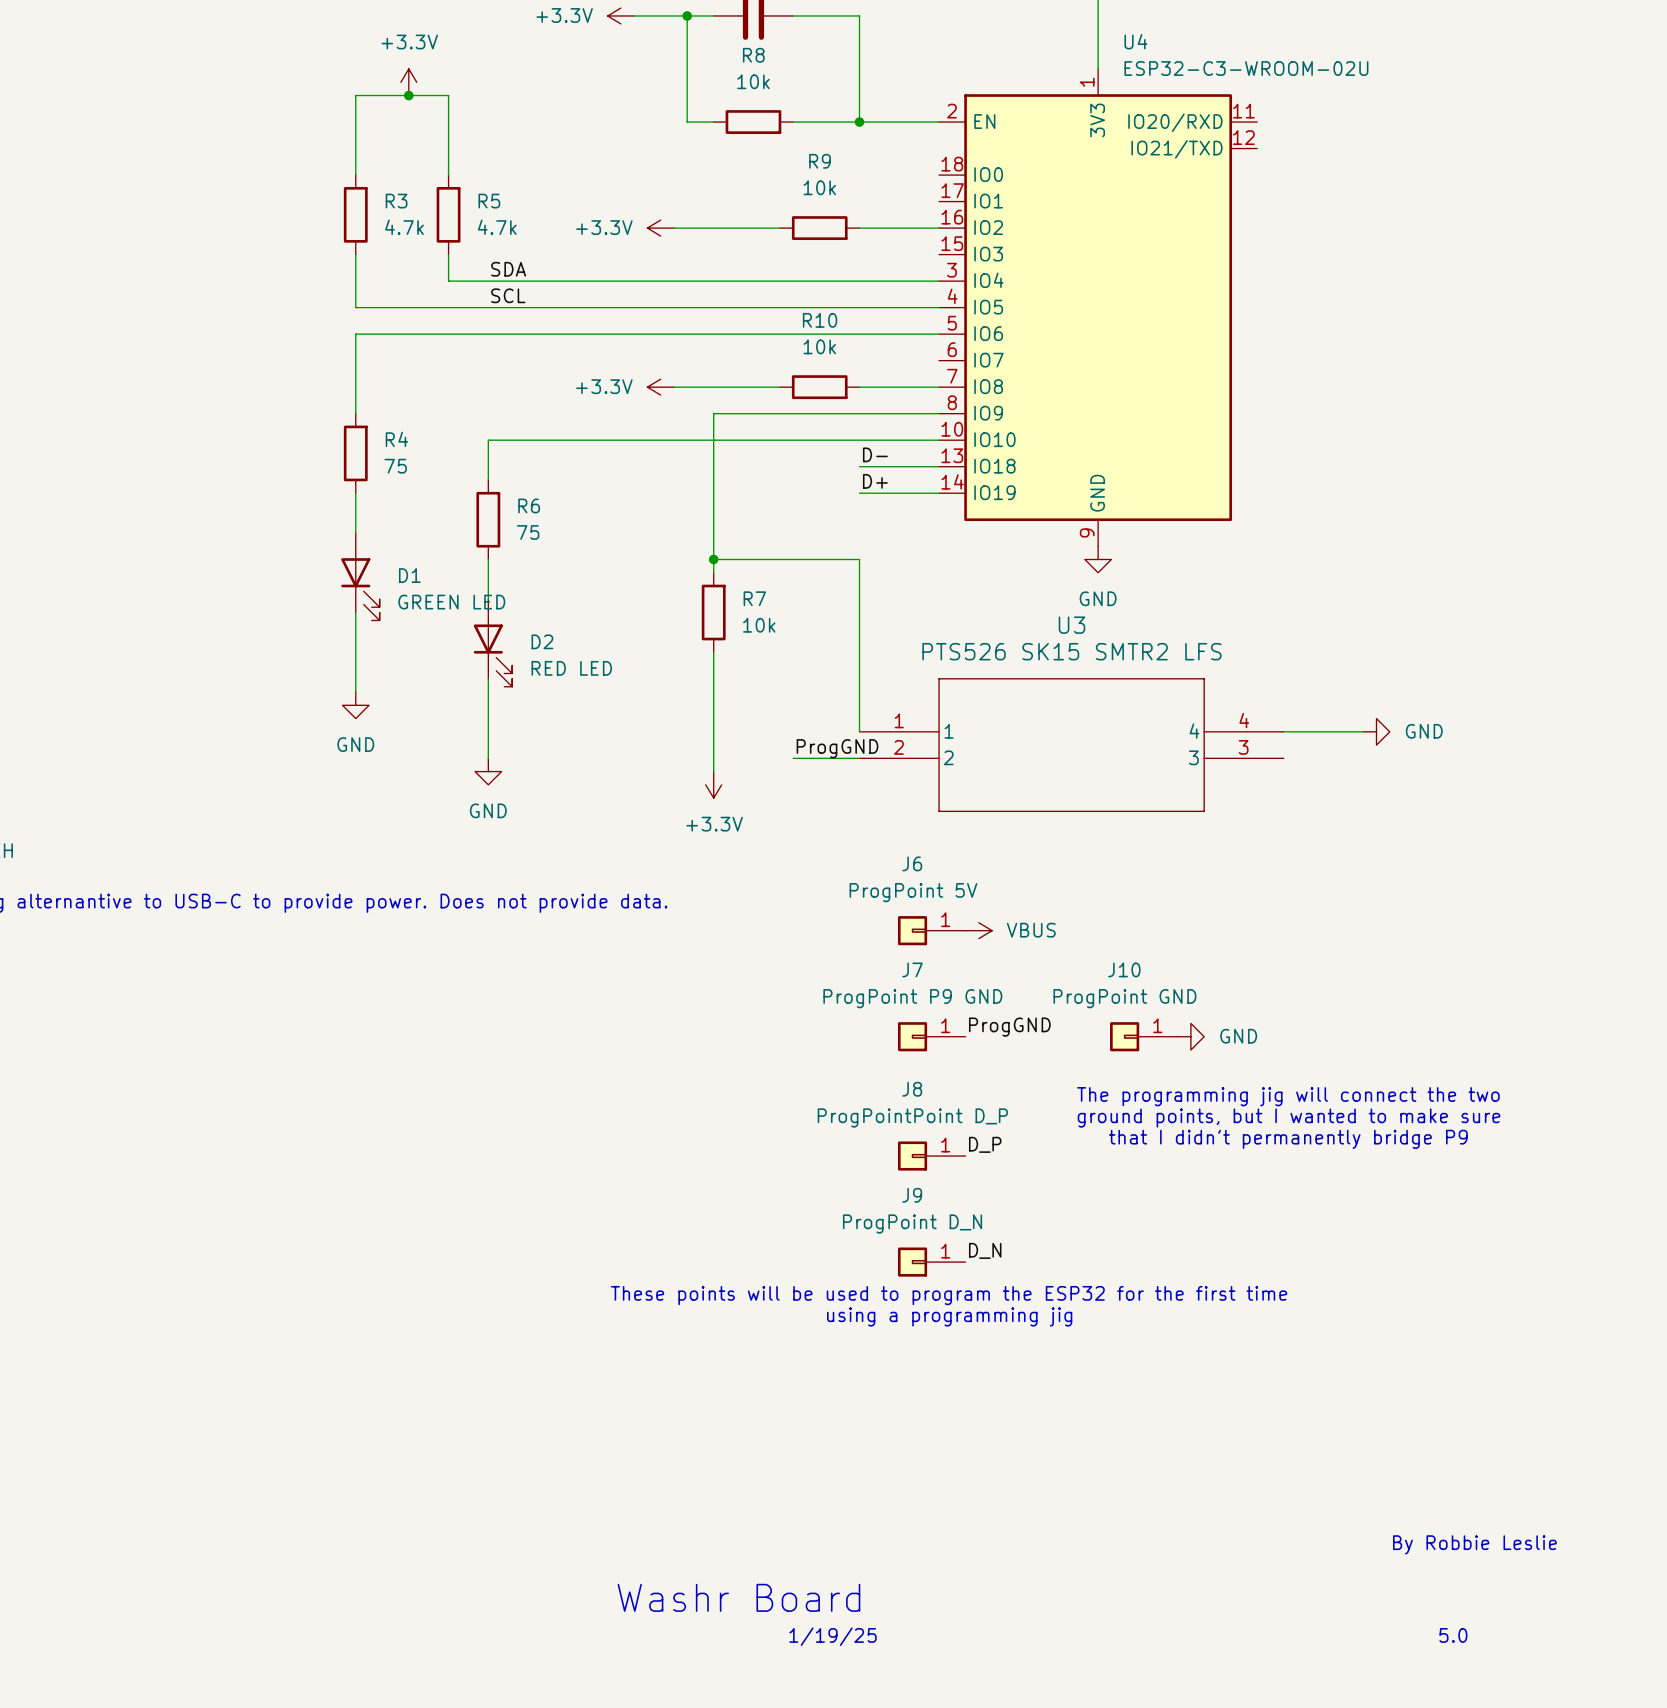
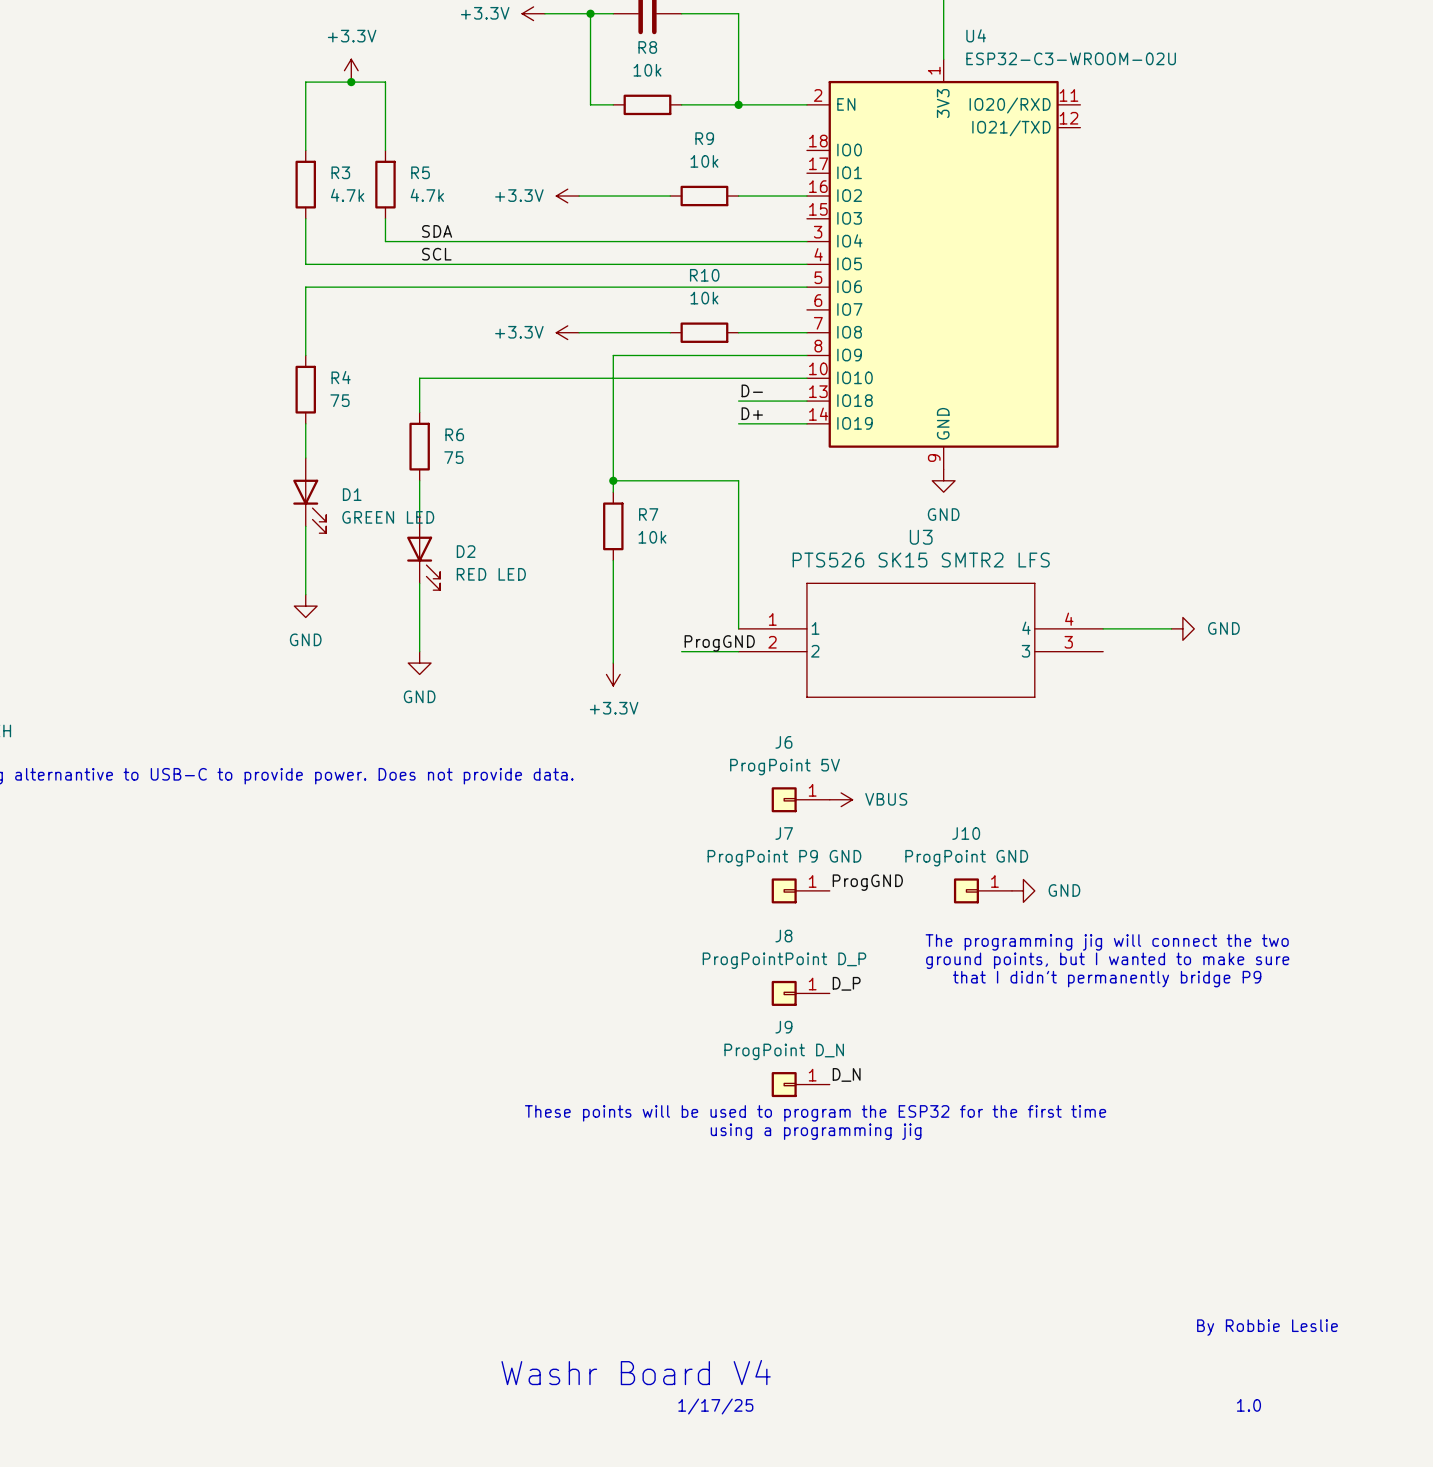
text: Washr Board (738, 1597) -> Washr Board V4 (636, 1372)
text: 5.0 (1453, 1635) -> 1.0 (1248, 1405)
text: 1/19/25 (833, 1636) -> 1/17/25 (715, 1406)

